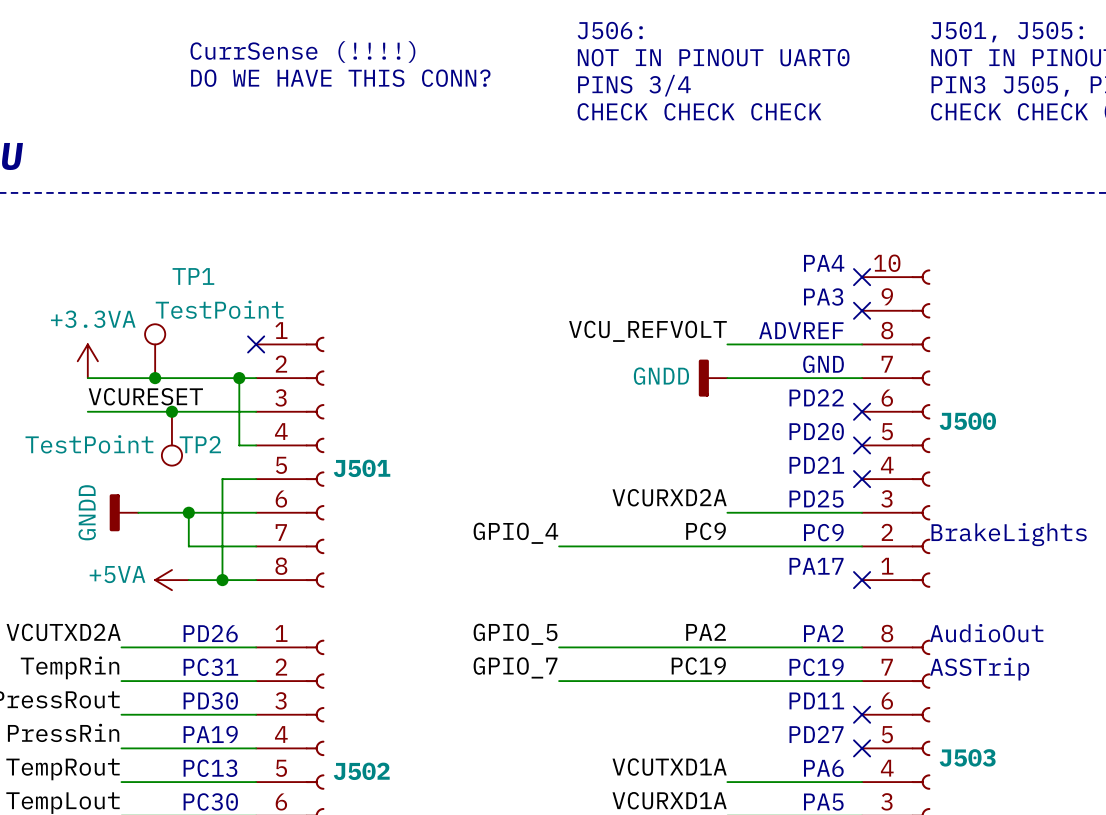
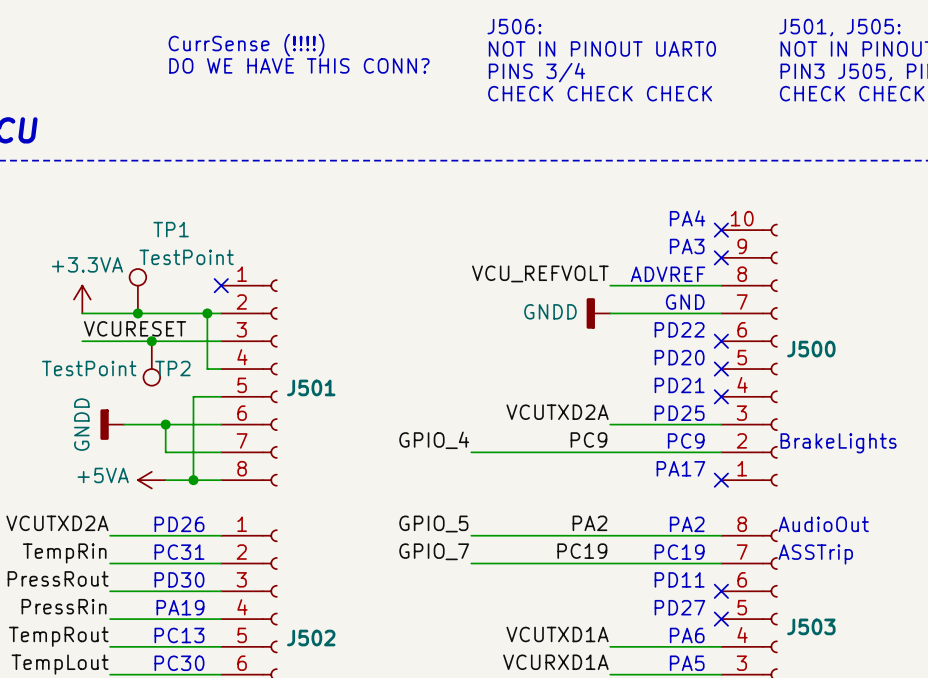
label: VCURXD2A (669, 497) -> VCUTXD2A (557, 412)

